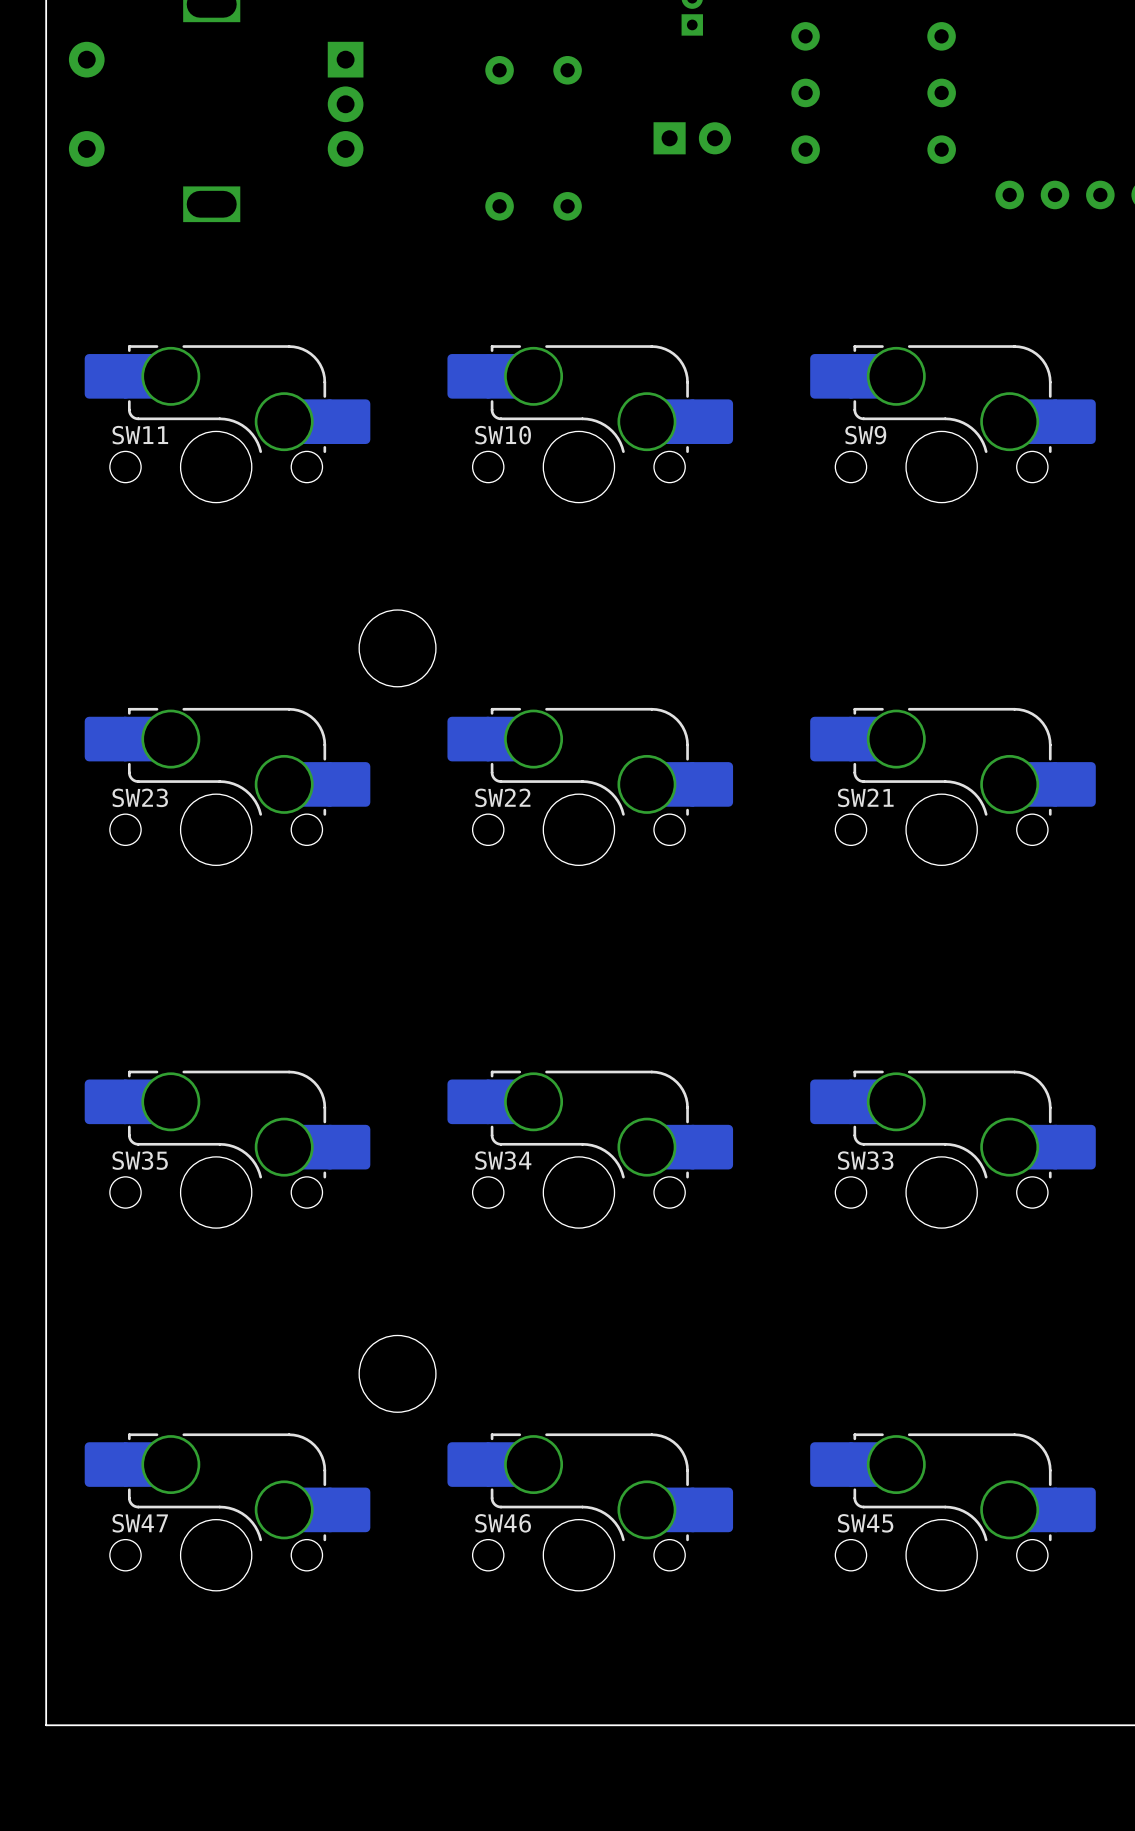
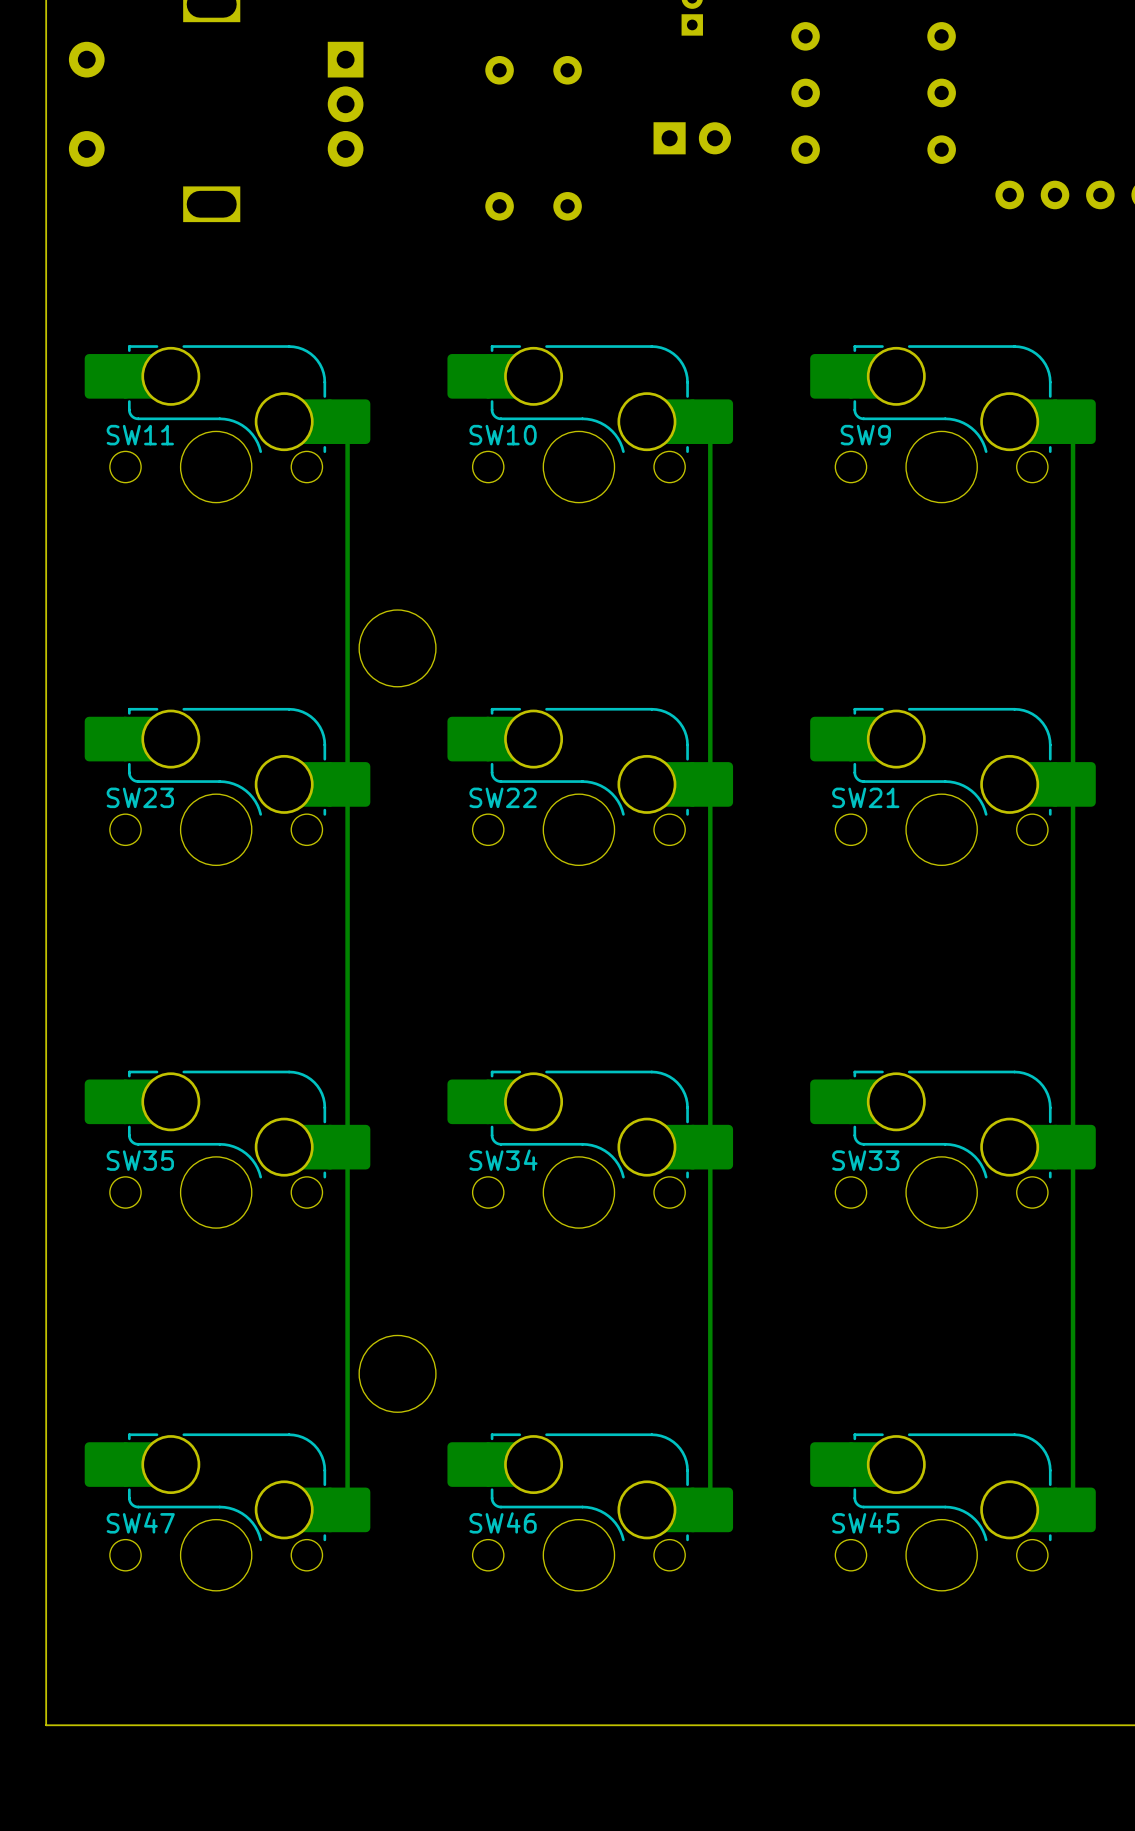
bottom track: none -> (347, 421) (347, 1509)
bottom track: none -> (710, 421) (710, 1509)
bottom track: none -> (1073, 421) (1073, 1509)

